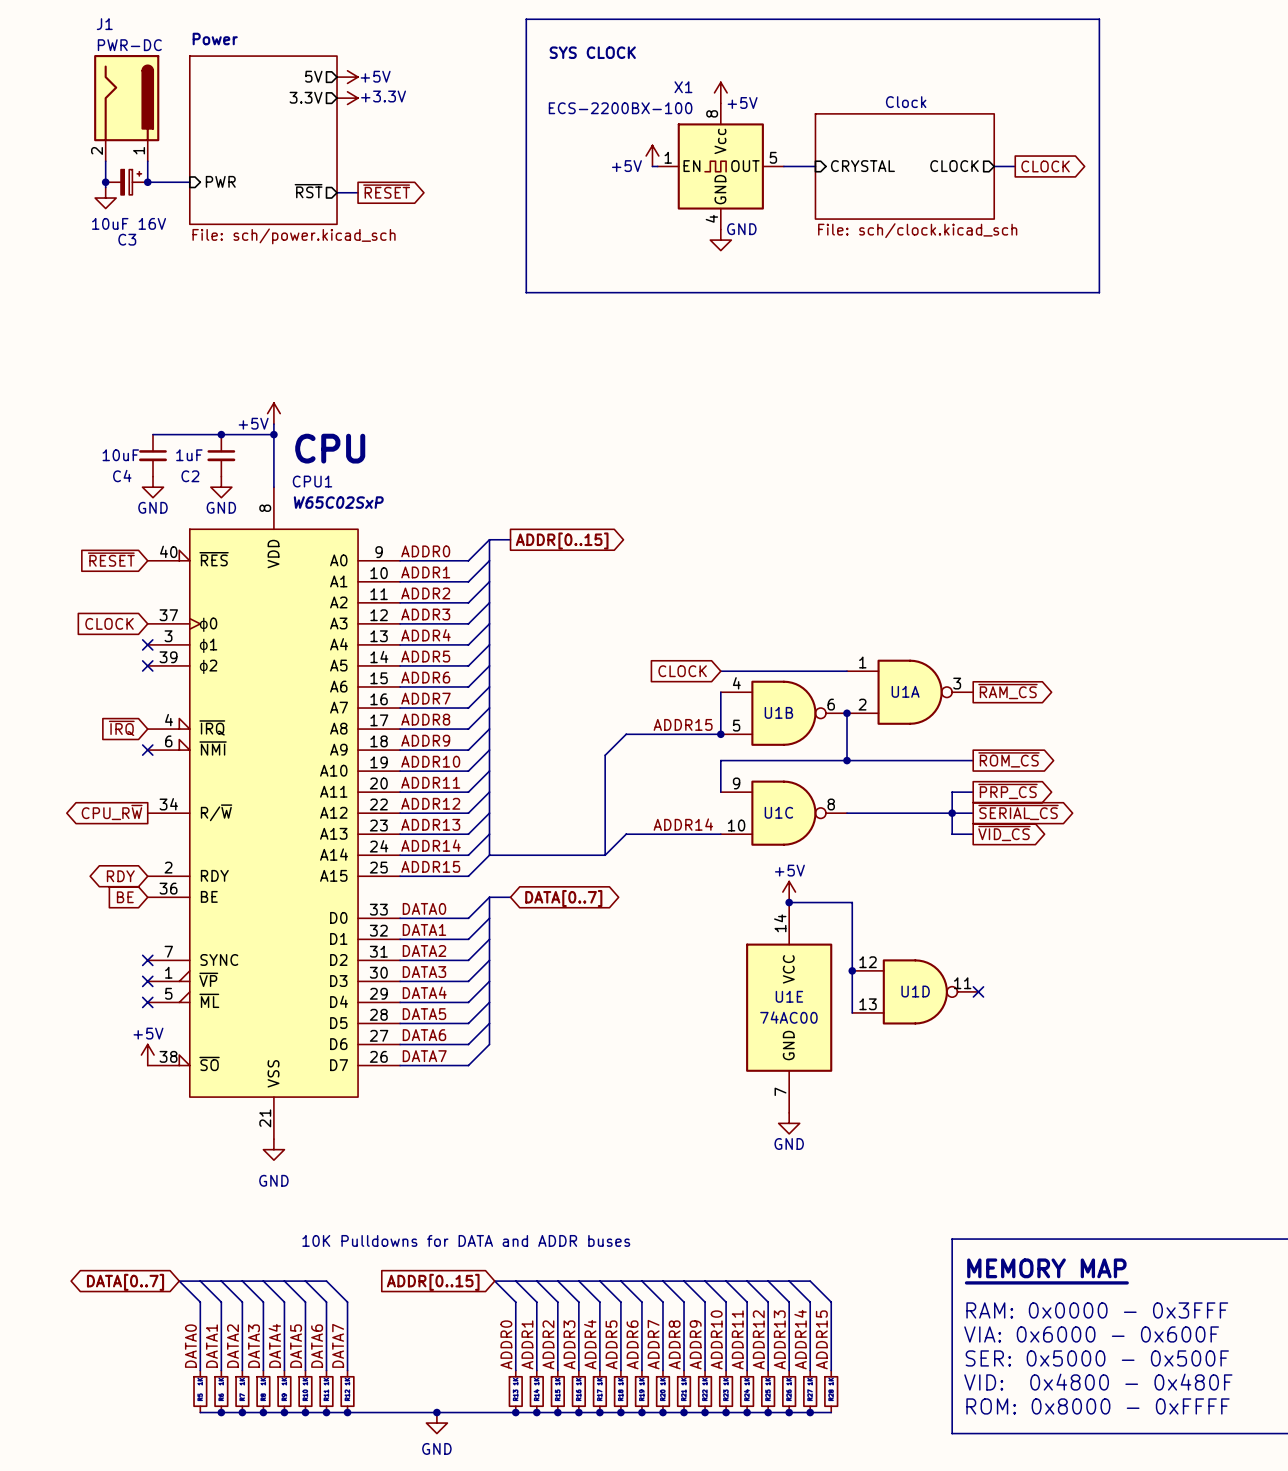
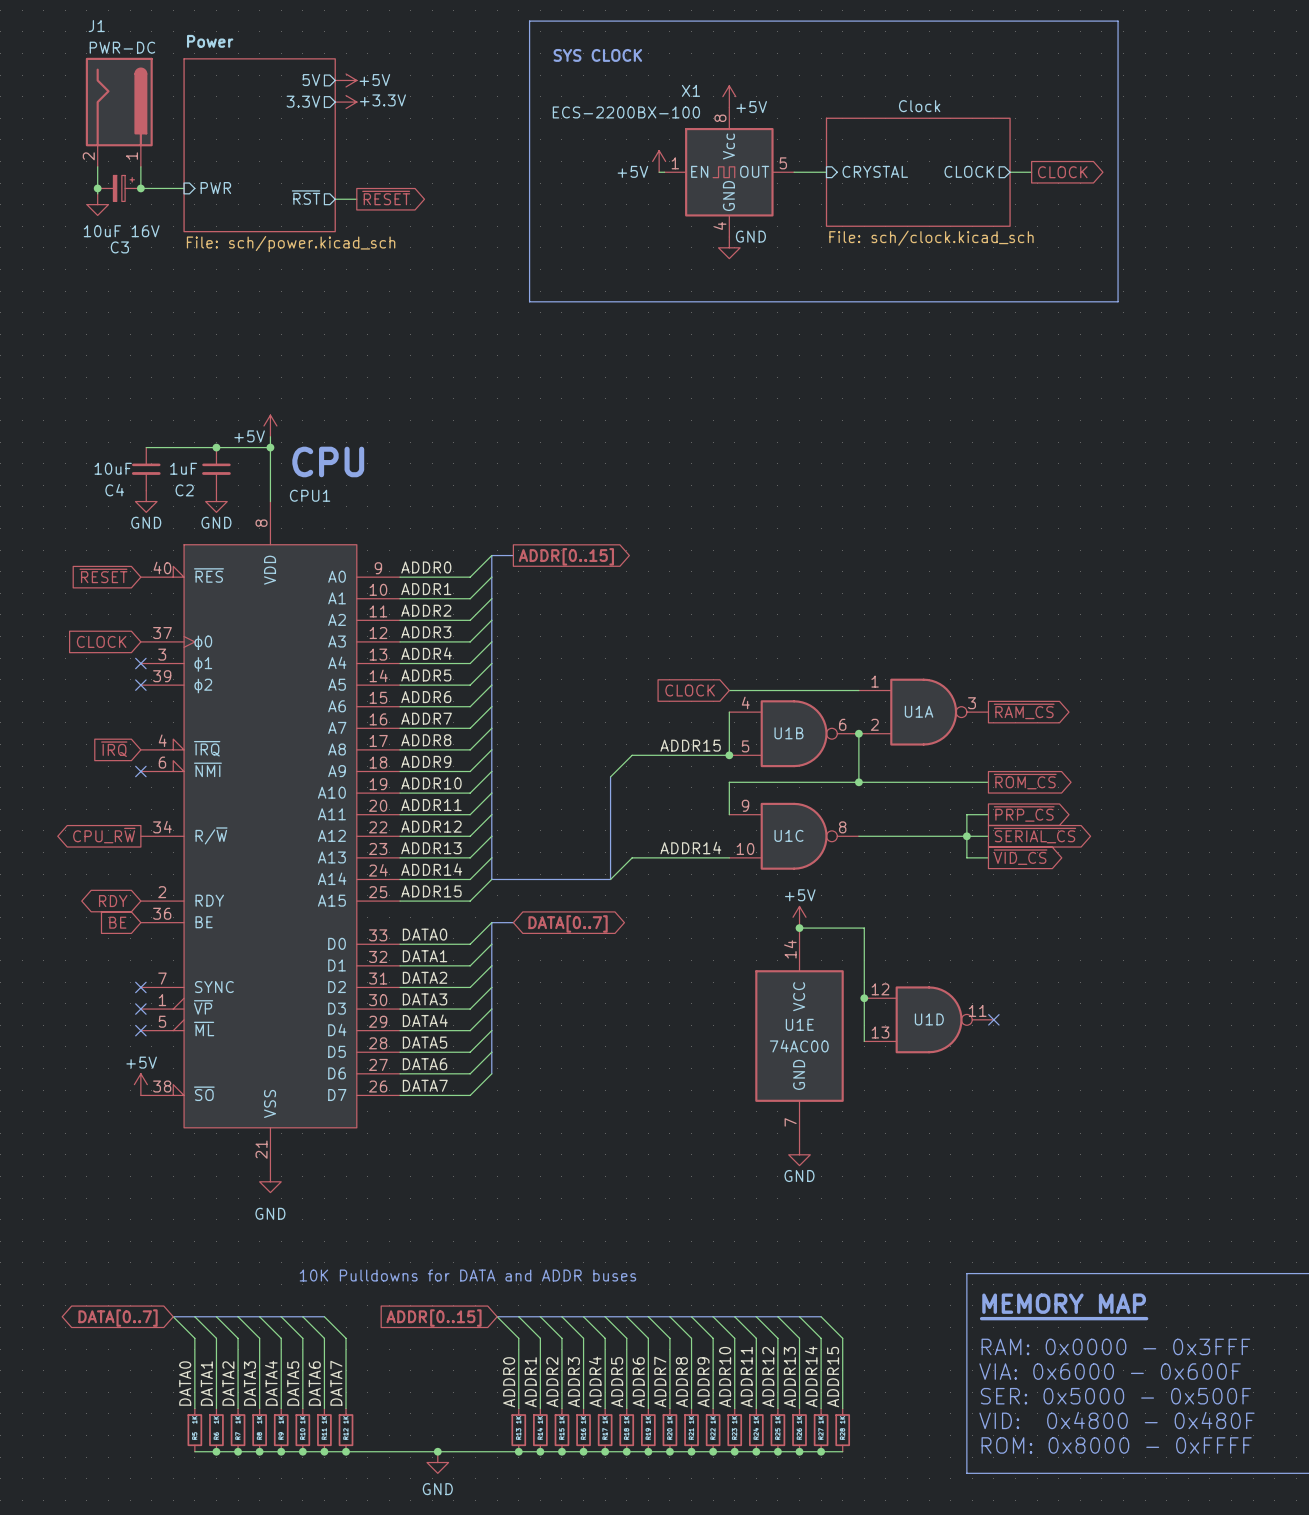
CPU1 value: W65C02SxP (338, 502) -> none

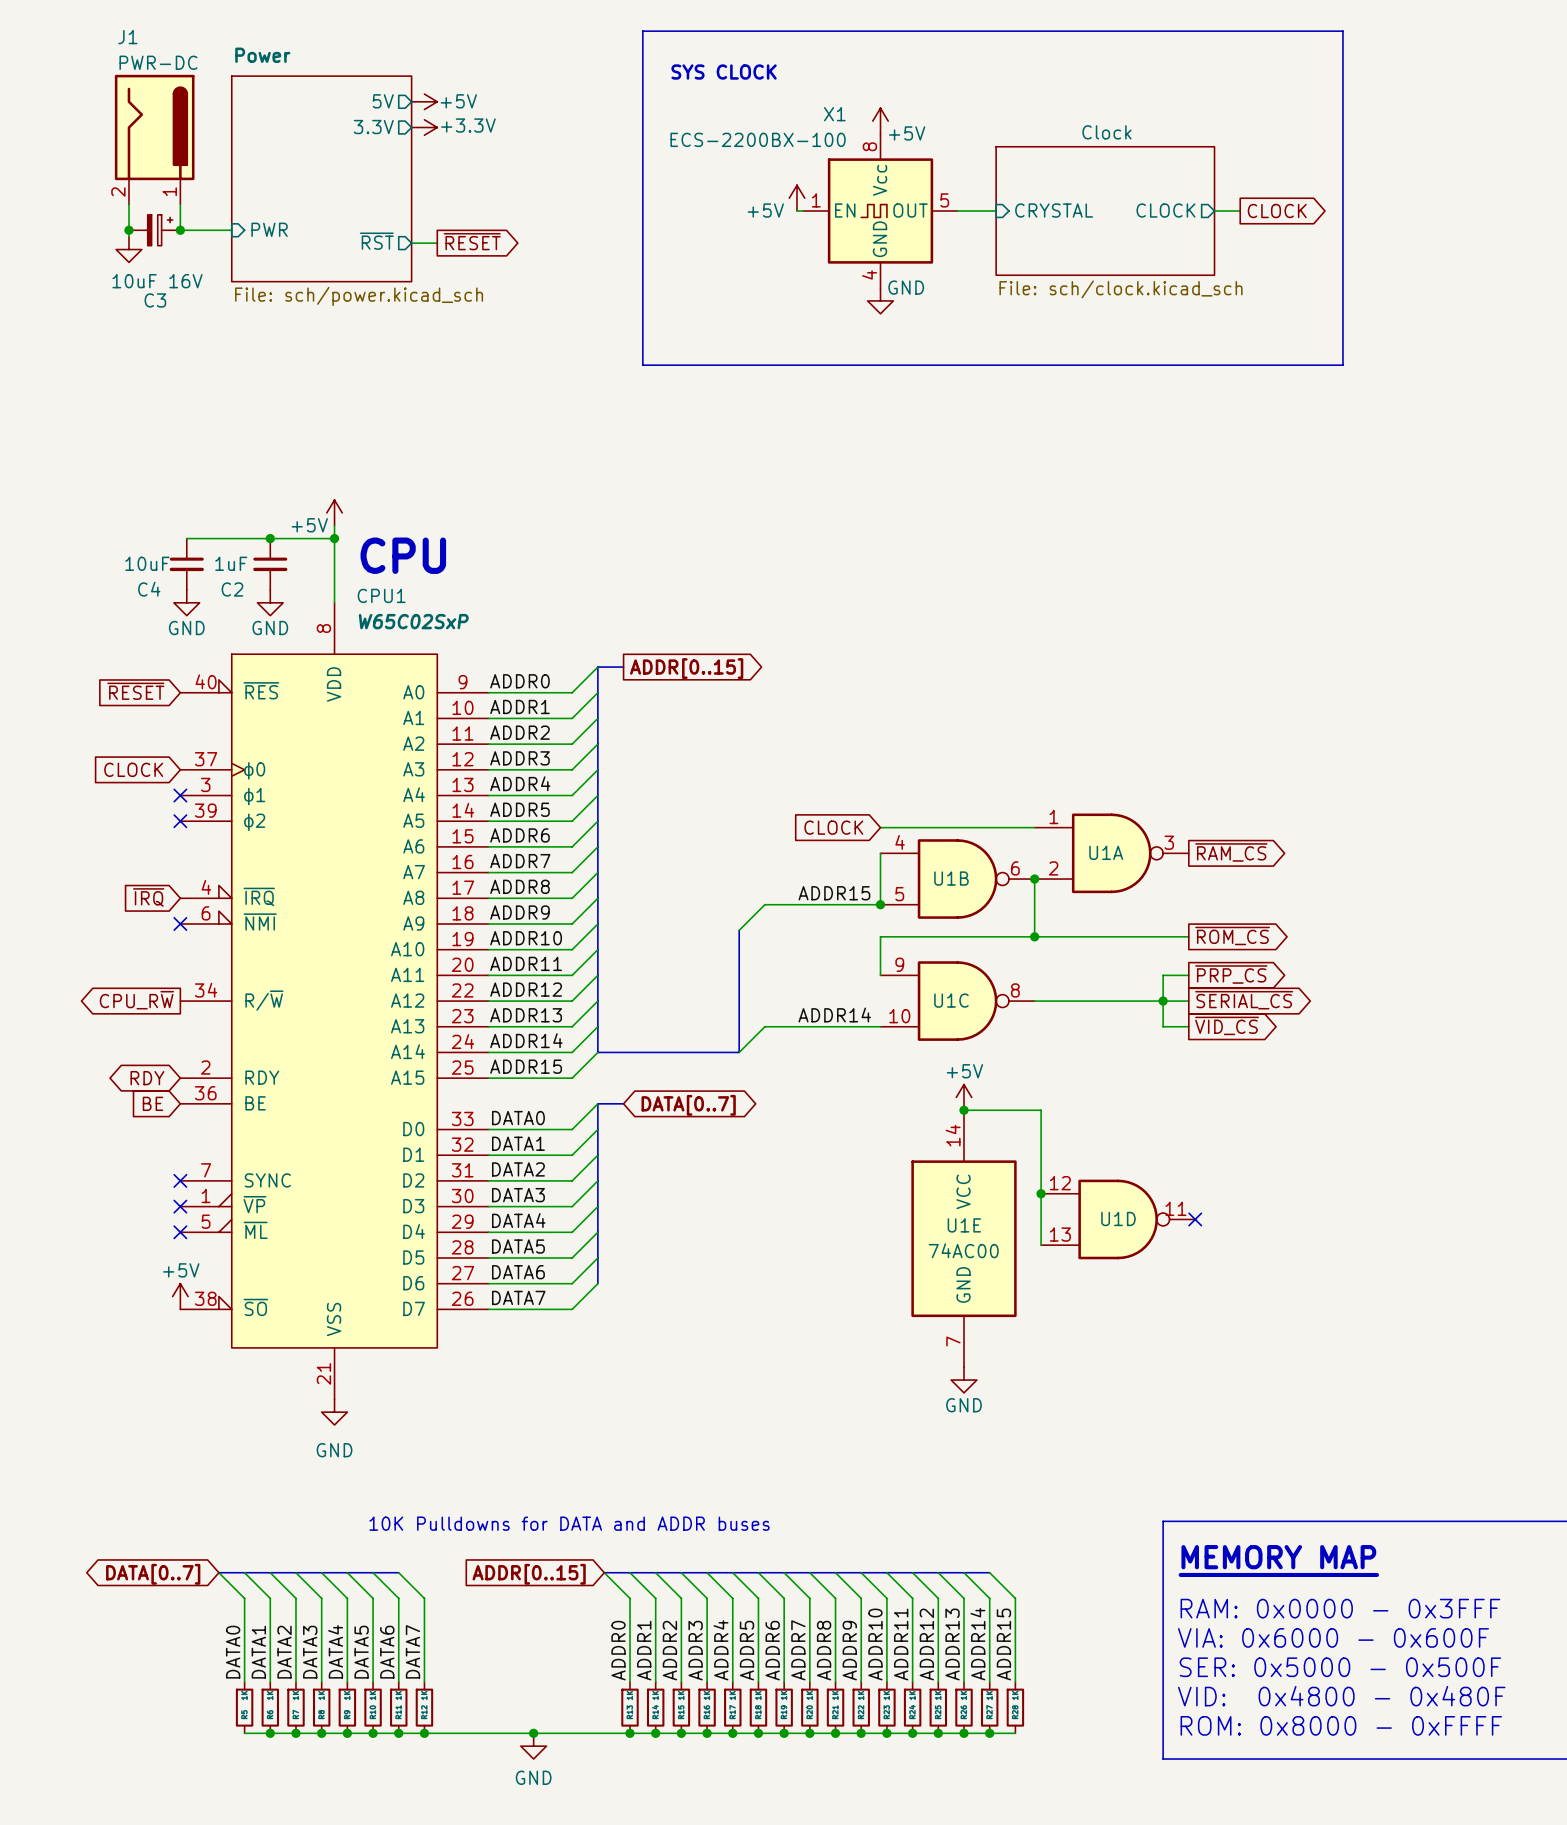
CPU1 value: none -> W65C02SxP (413, 621)

